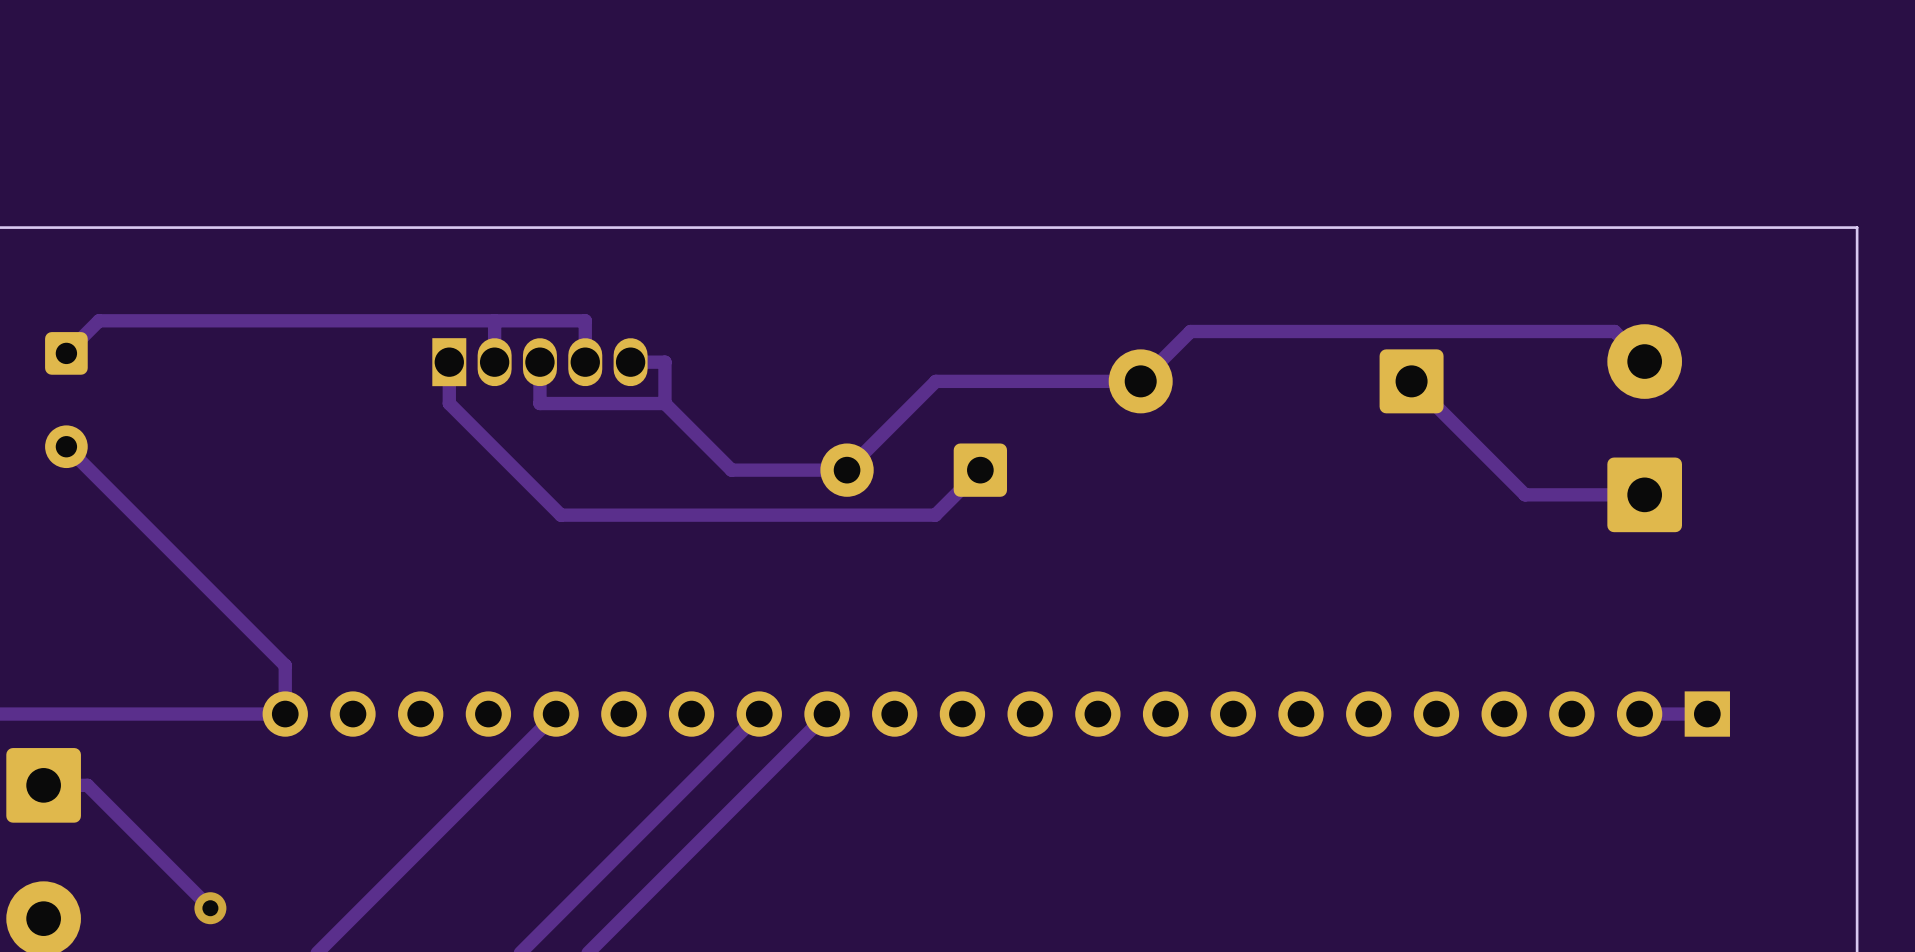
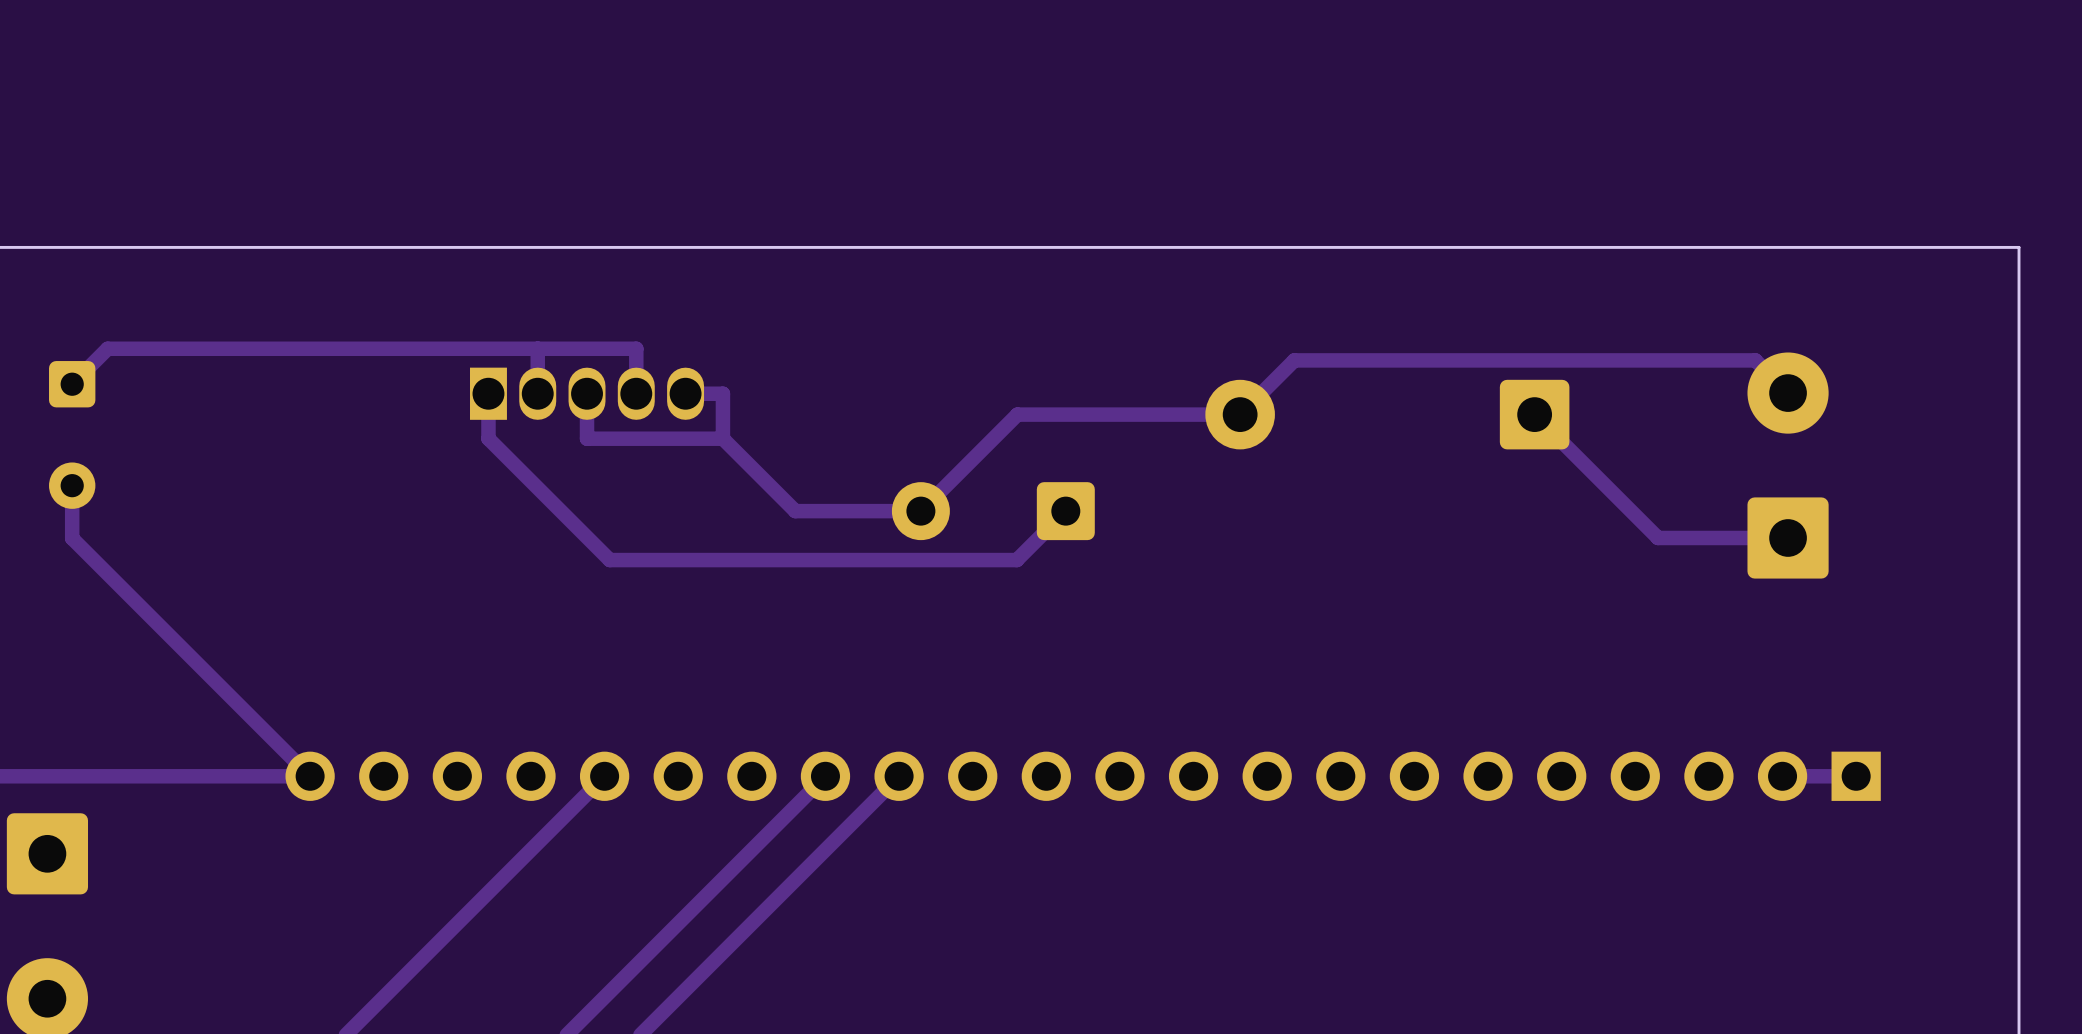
track: (66, 446) (285, 665) (285, 714) -> (72, 485) (72, 538) (310, 776)
track: (43, 785) (87, 785) (210, 908) -> none
via: (210, 908) -> none

